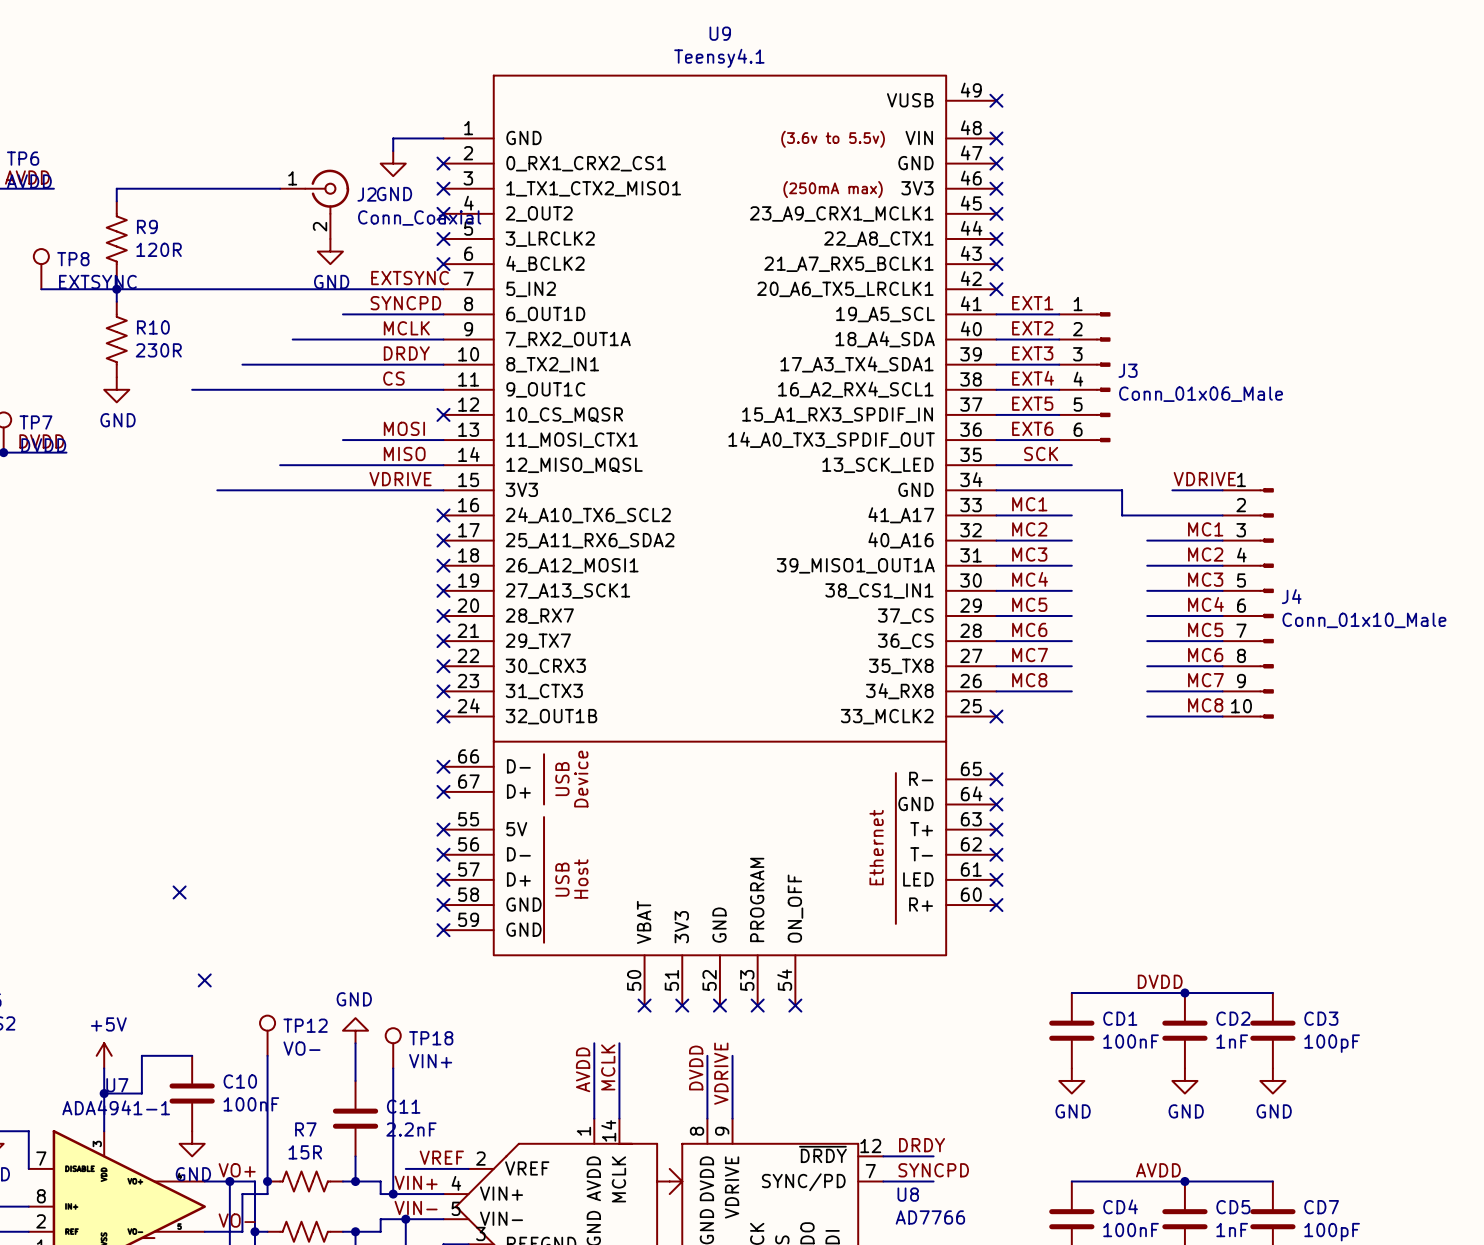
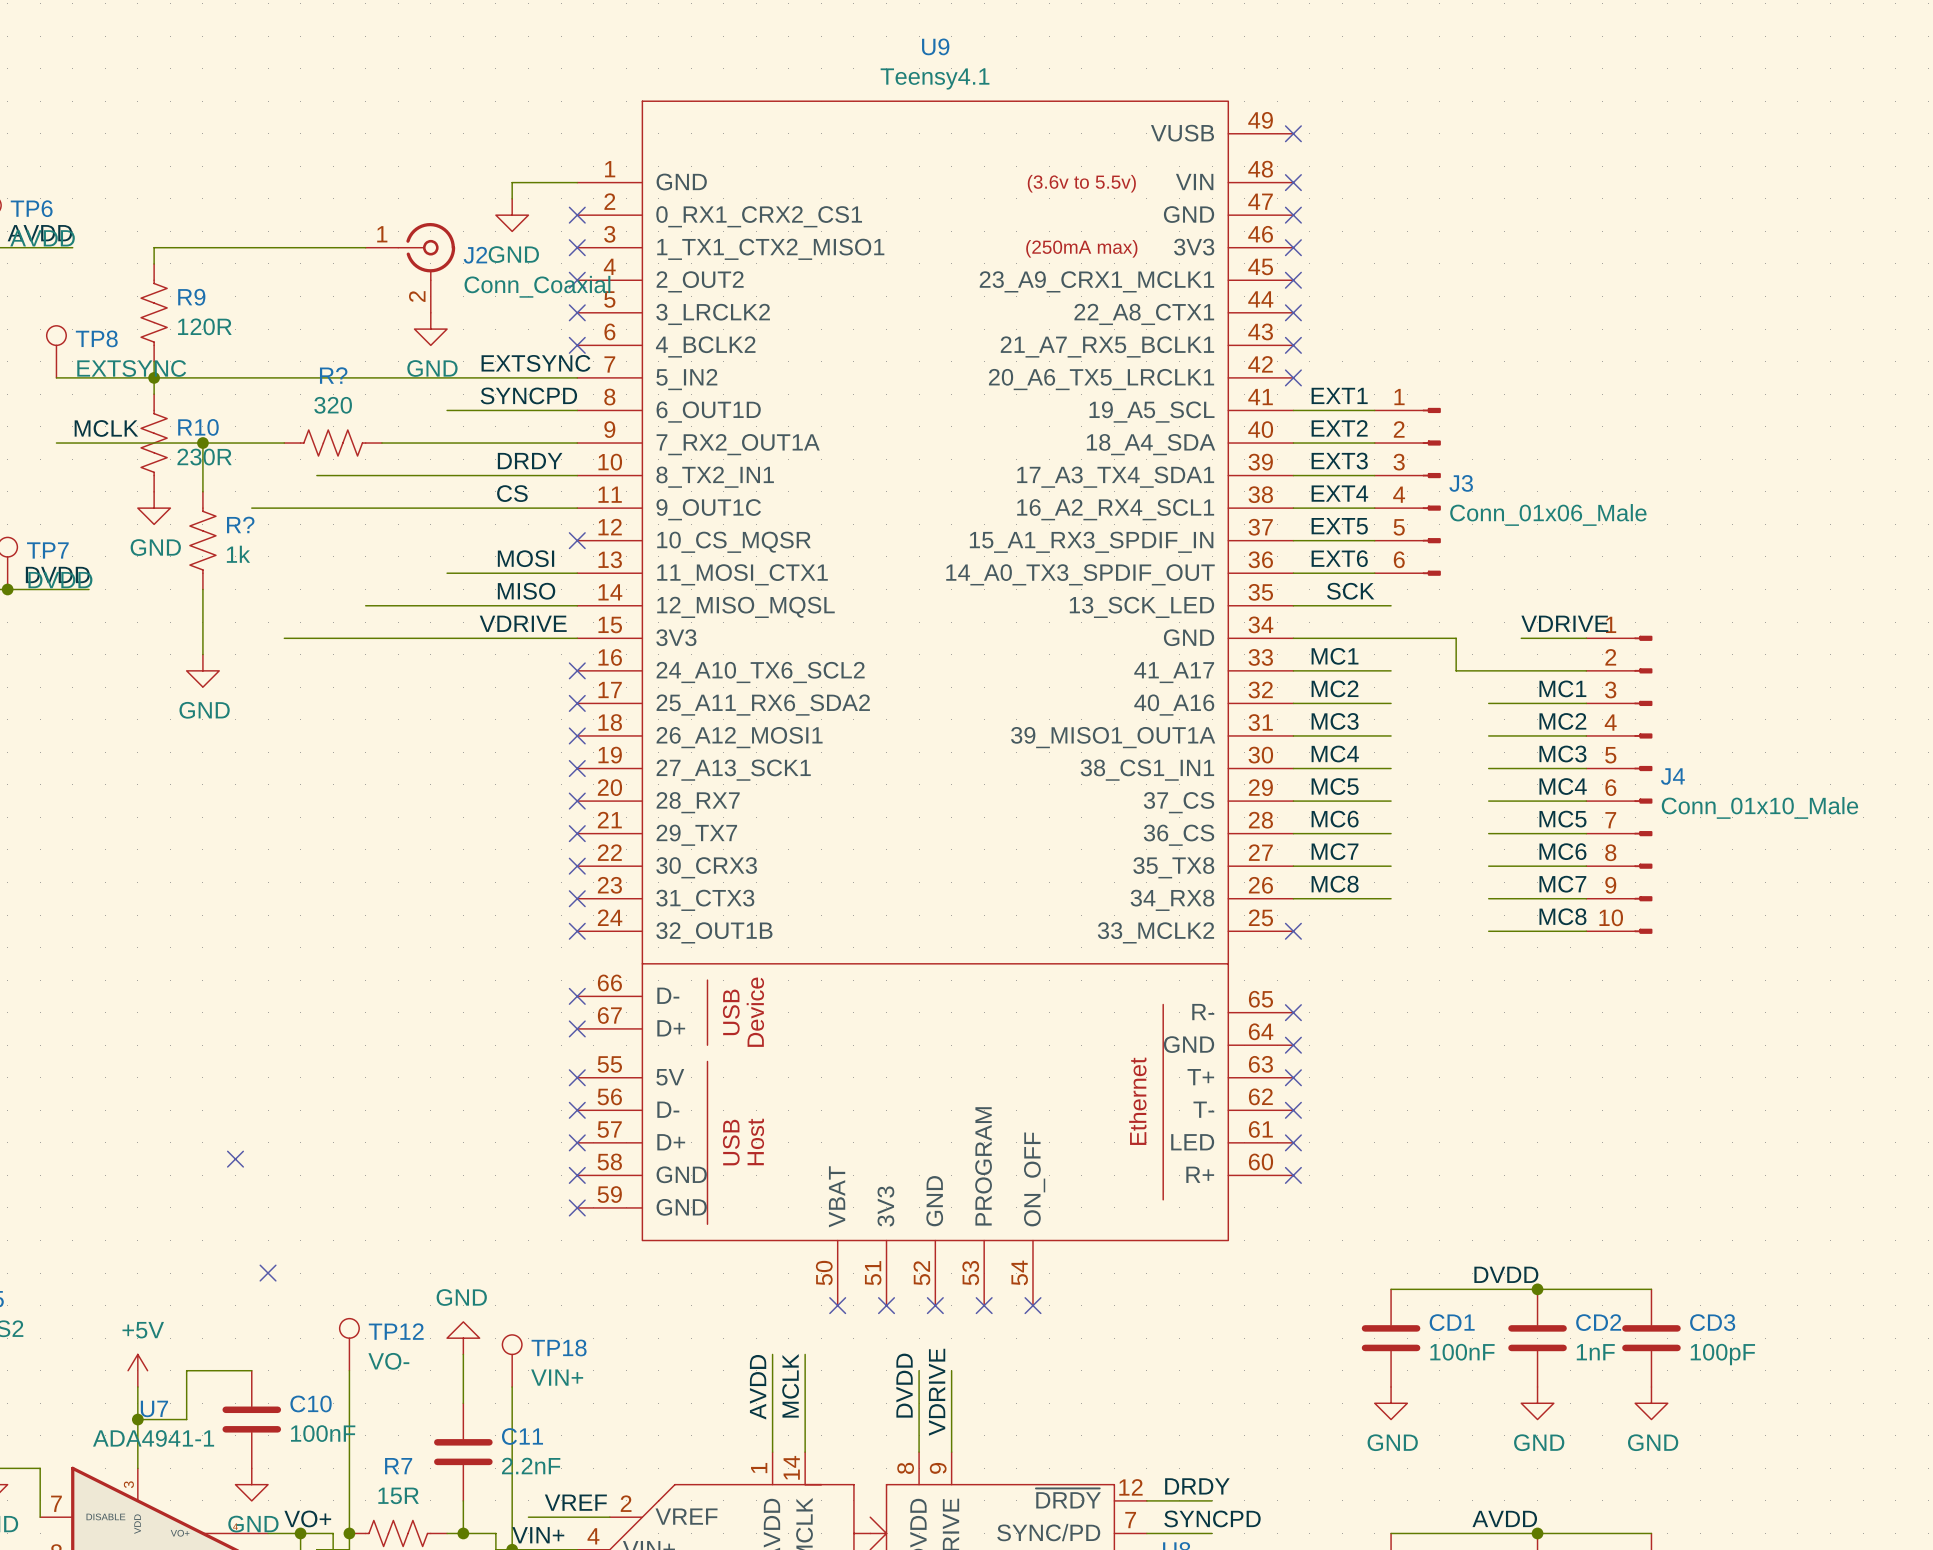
label: none -> MCLK (106, 428)
label: MCLK (406, 328) -> none
wire: none -> (56, 443) (284, 443)
wire: none -> (202, 443) (202, 491)
junction: none -> (202, 443)
R?: none -> 320 (333, 443)
R?: none -> 1k (202, 540)
wire: none -> (202, 589) (202, 654)
power symbol: none -> GND (202, 670)

